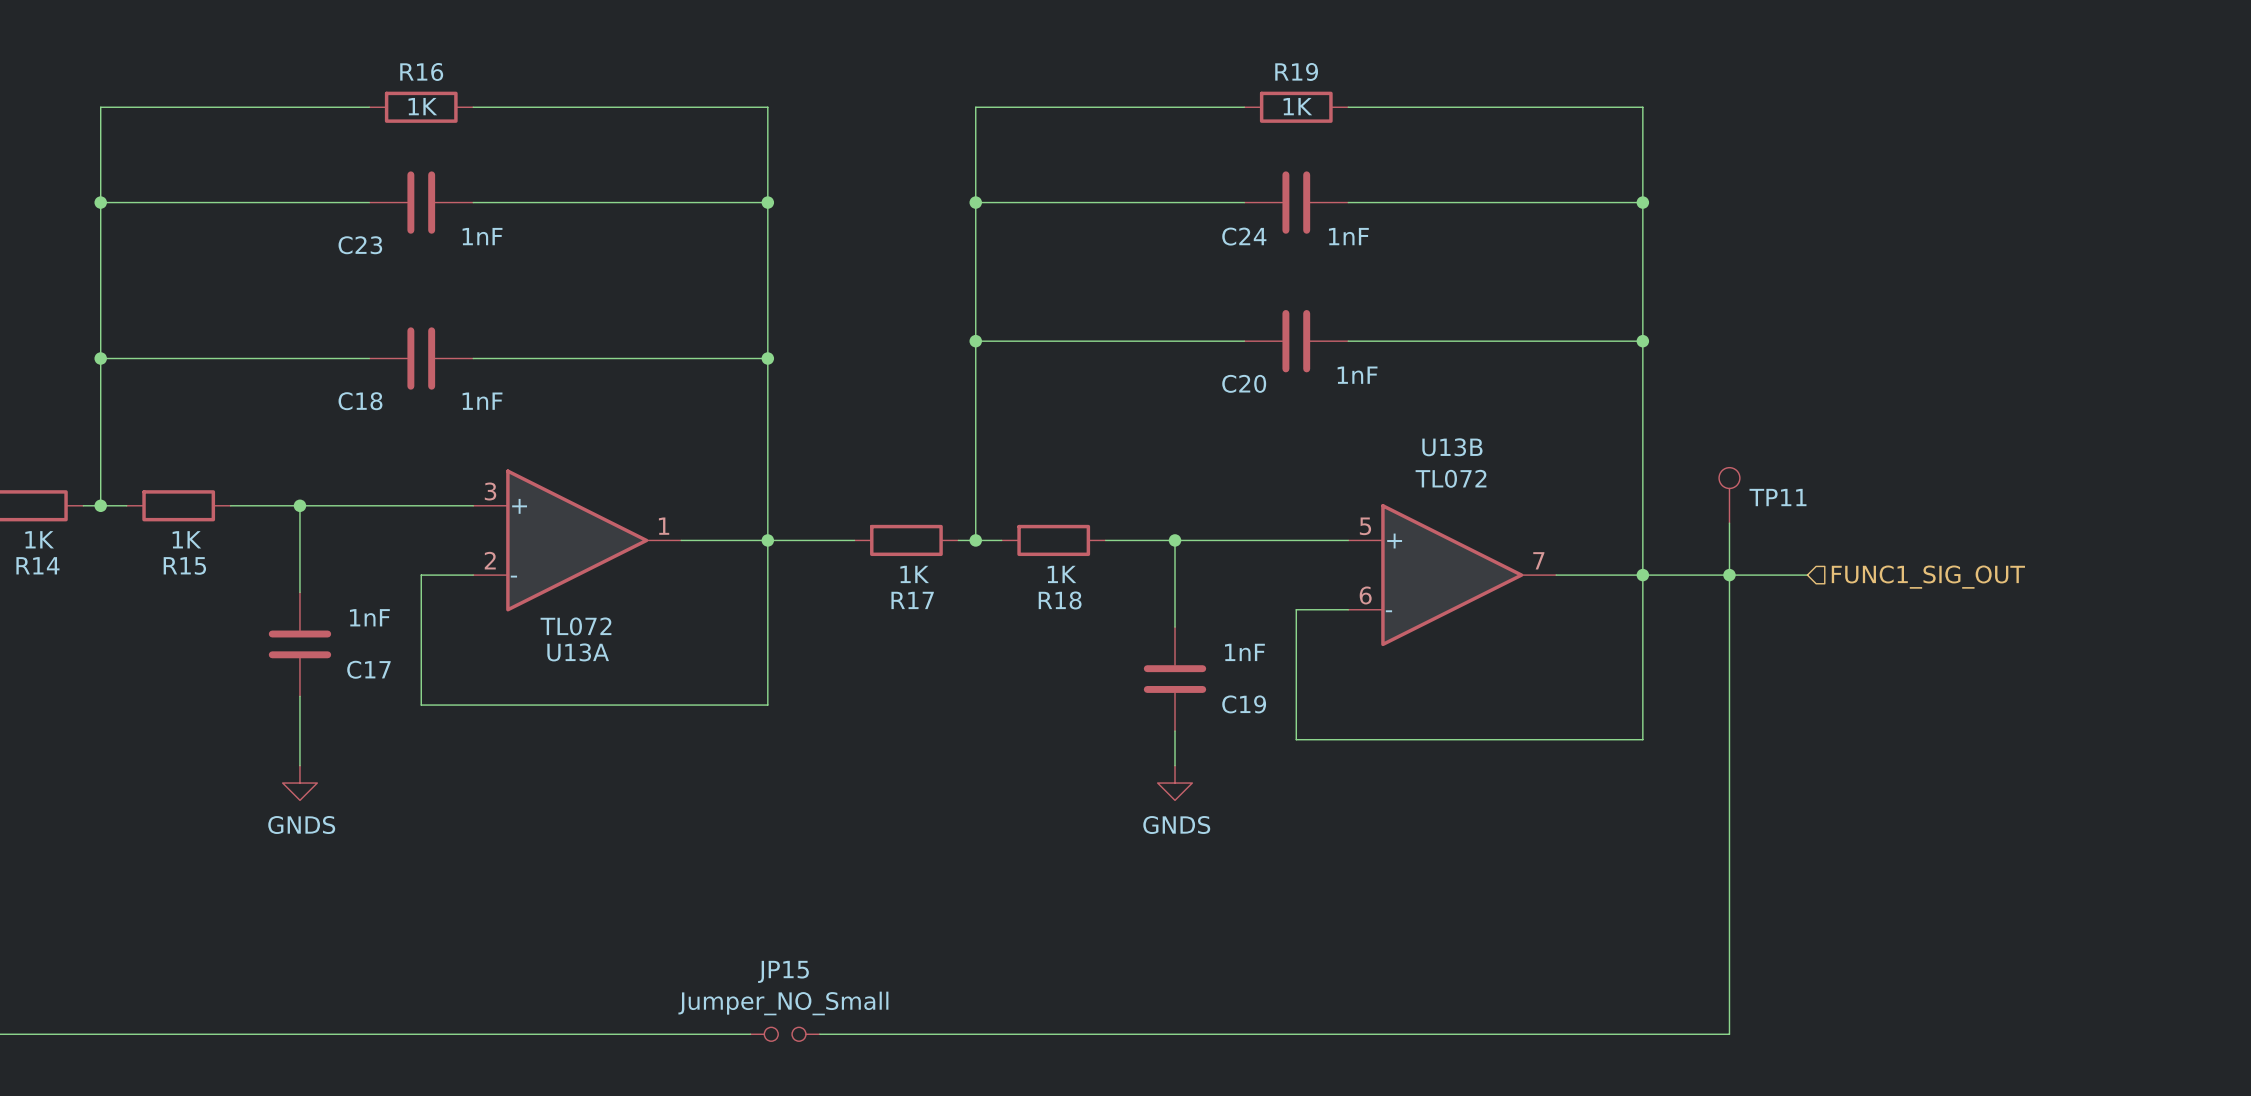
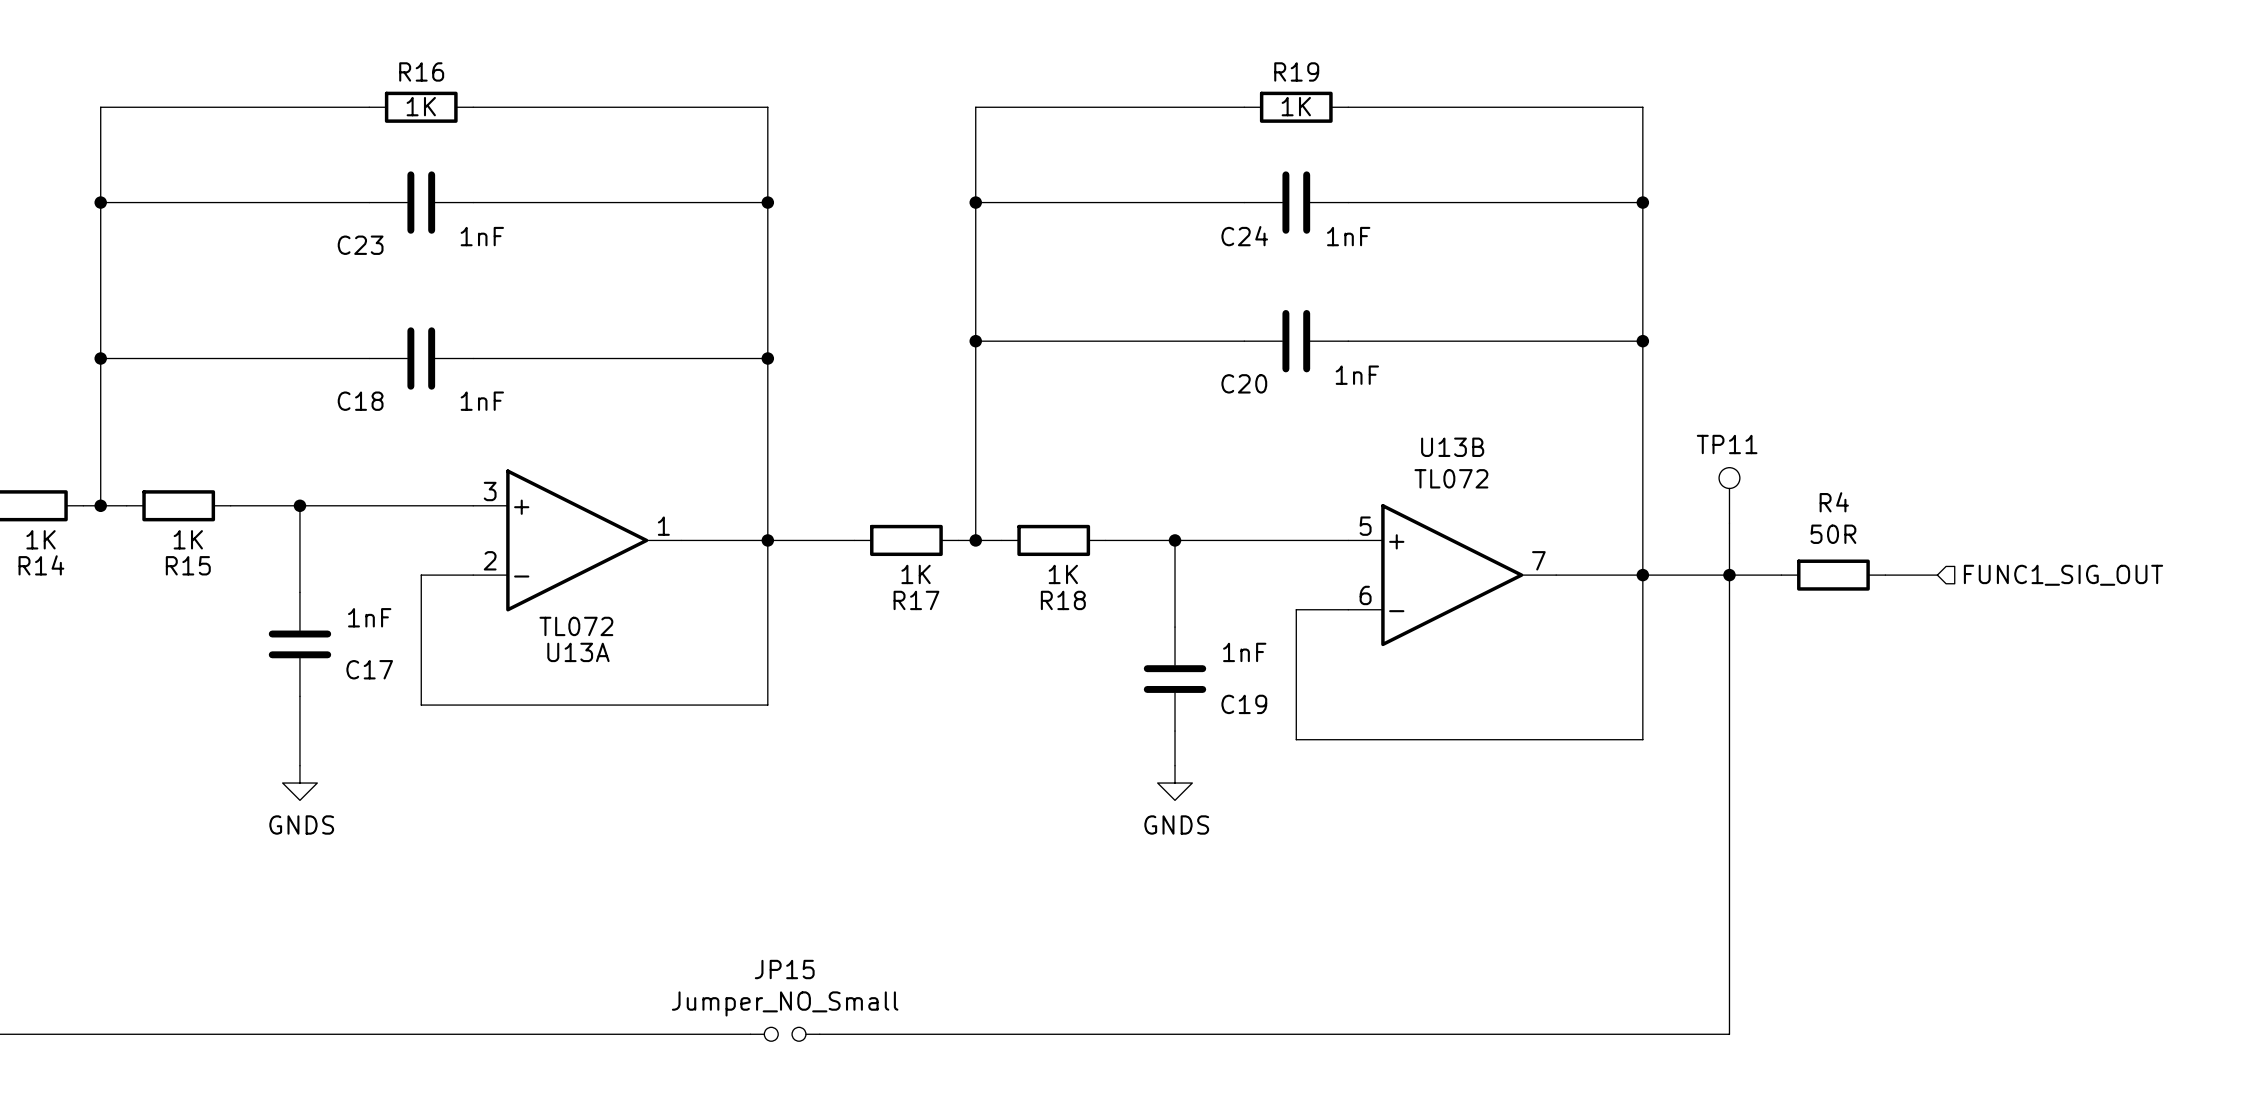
TP11 name position: TP11 (1777, 497) -> TP11 (1727, 444)
R4: none -> 50R (1833, 575)
wire: none -> (1885, 575) (1937, 575)
hierarchical label position: FUNC1_SIG_OUT (1928, 577) -> FUNC1_SIG_OUT (2063, 575)

